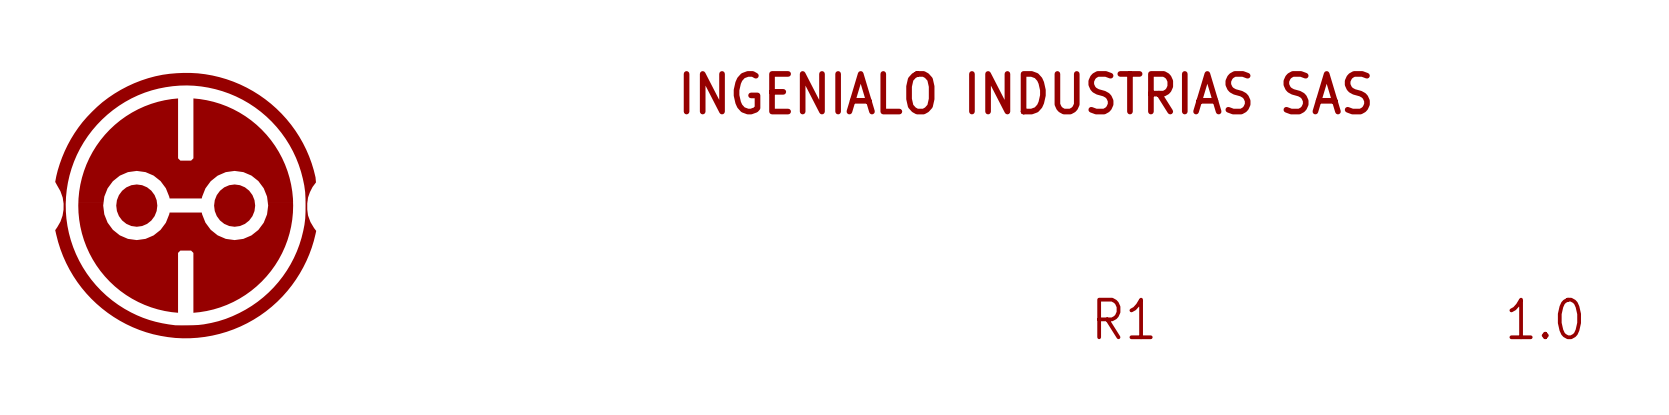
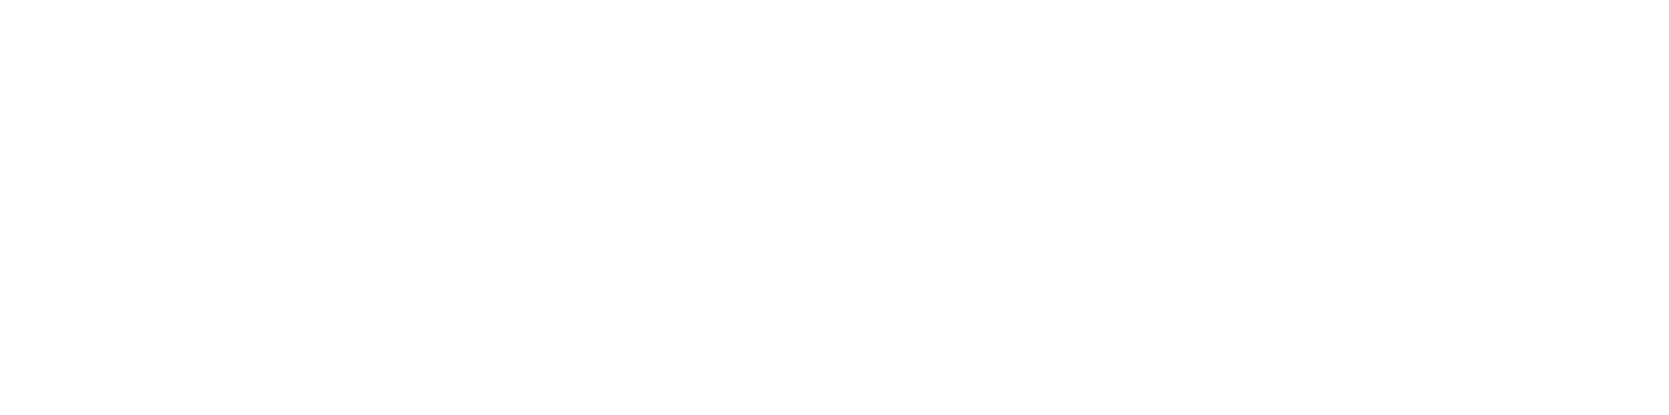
text: INGENIALO INDUSTRIAS SAS (1026, 92) -> none
part: (185, 205) -> none
text: R1 (1124, 318) -> none
text: 1.0 (1545, 318) -> none

